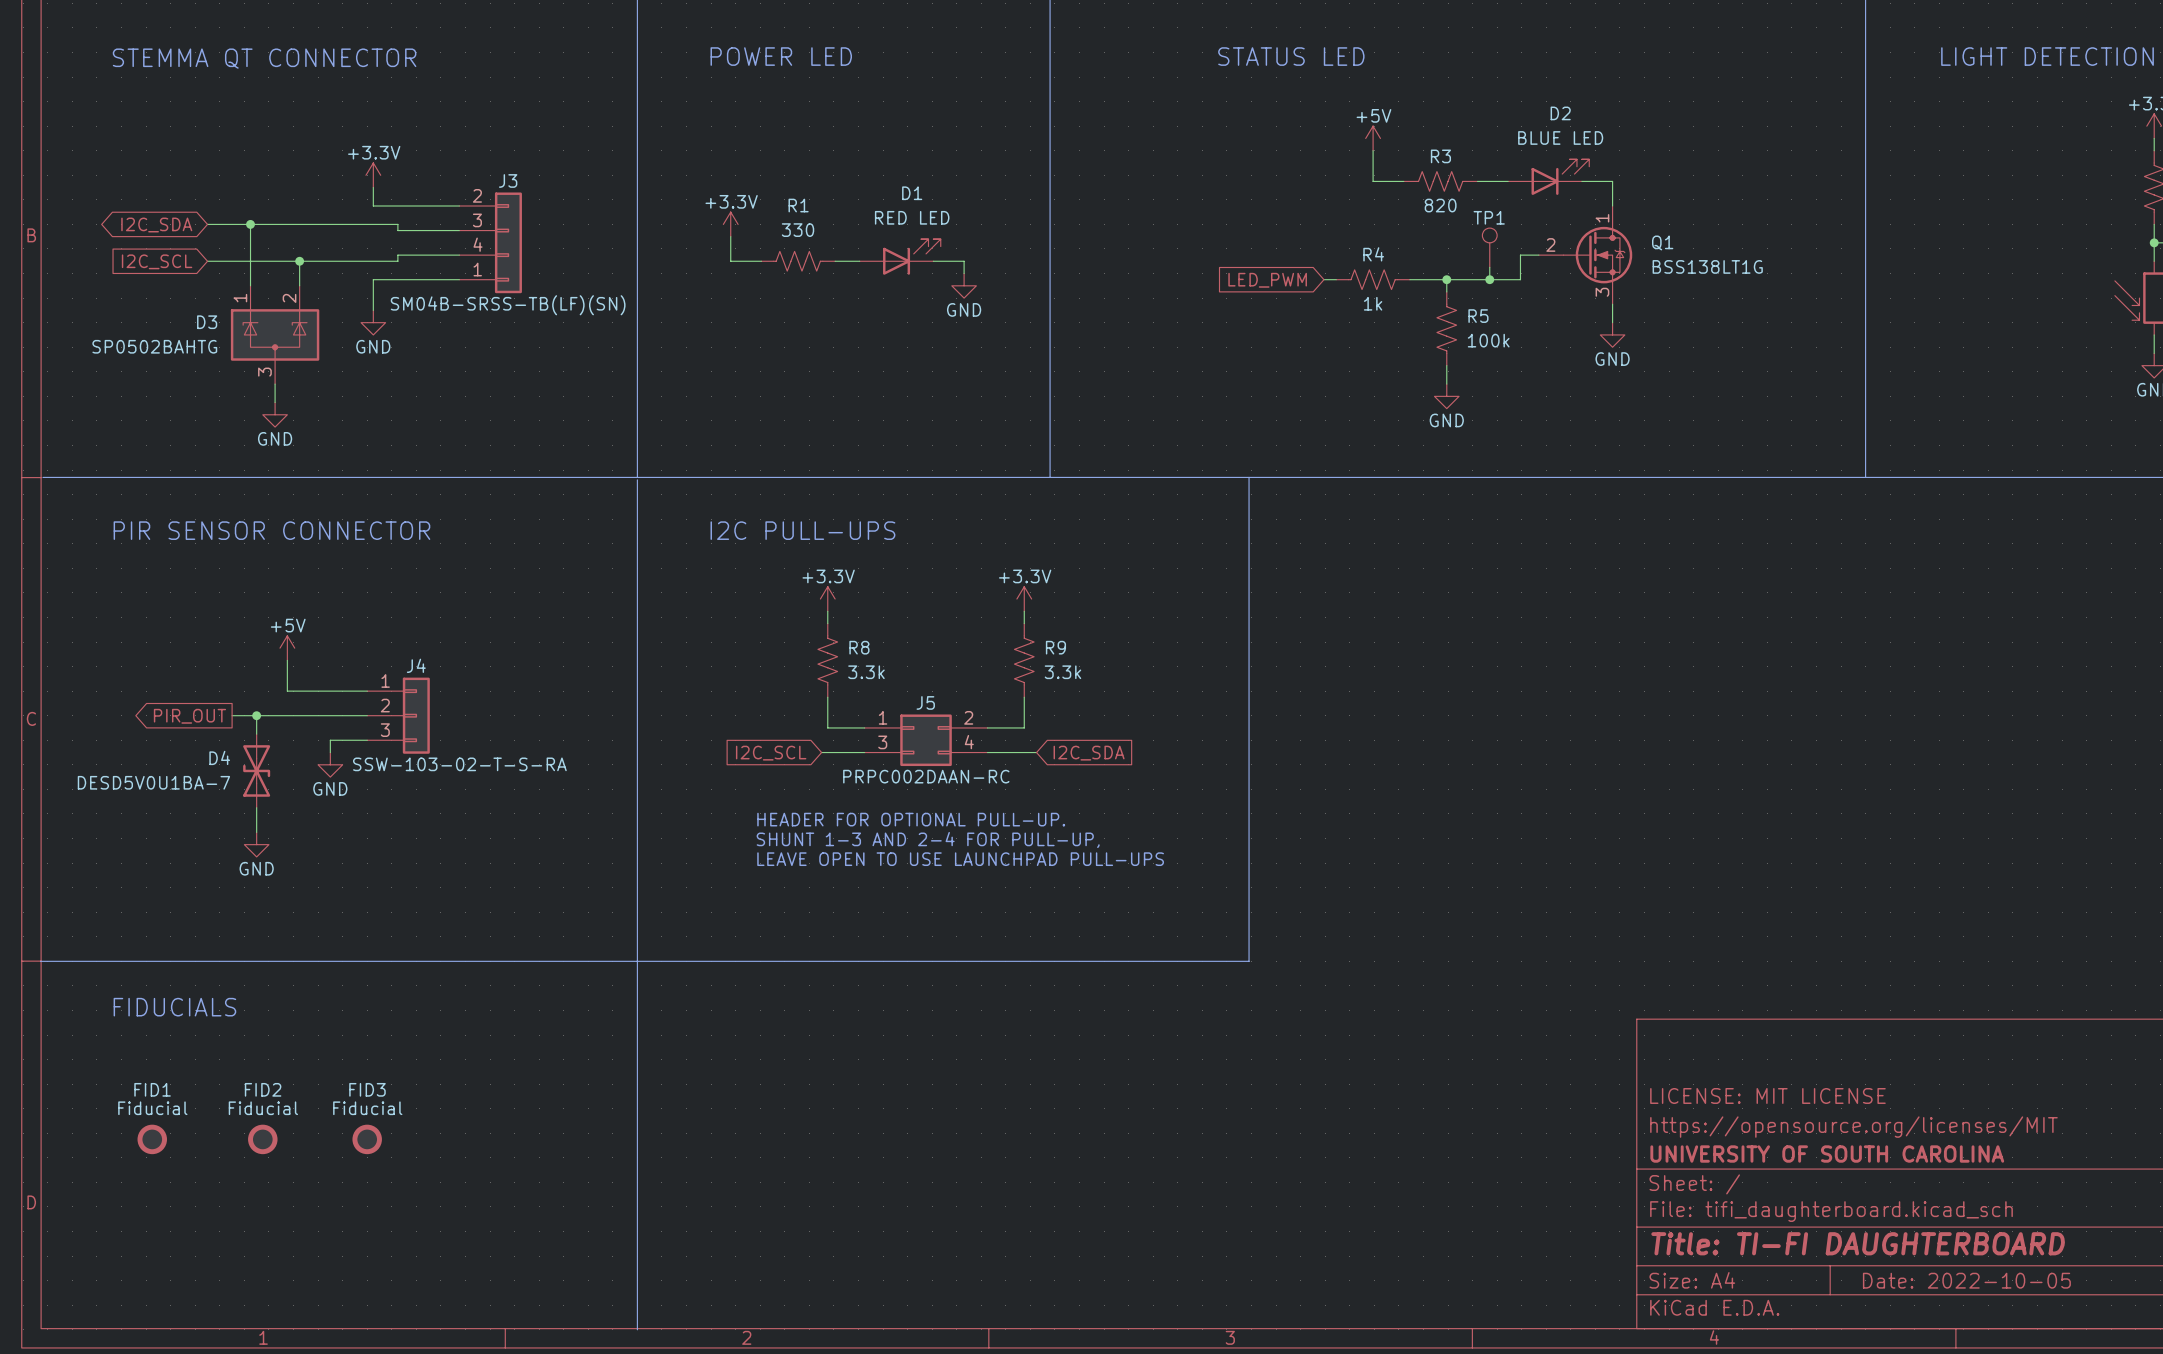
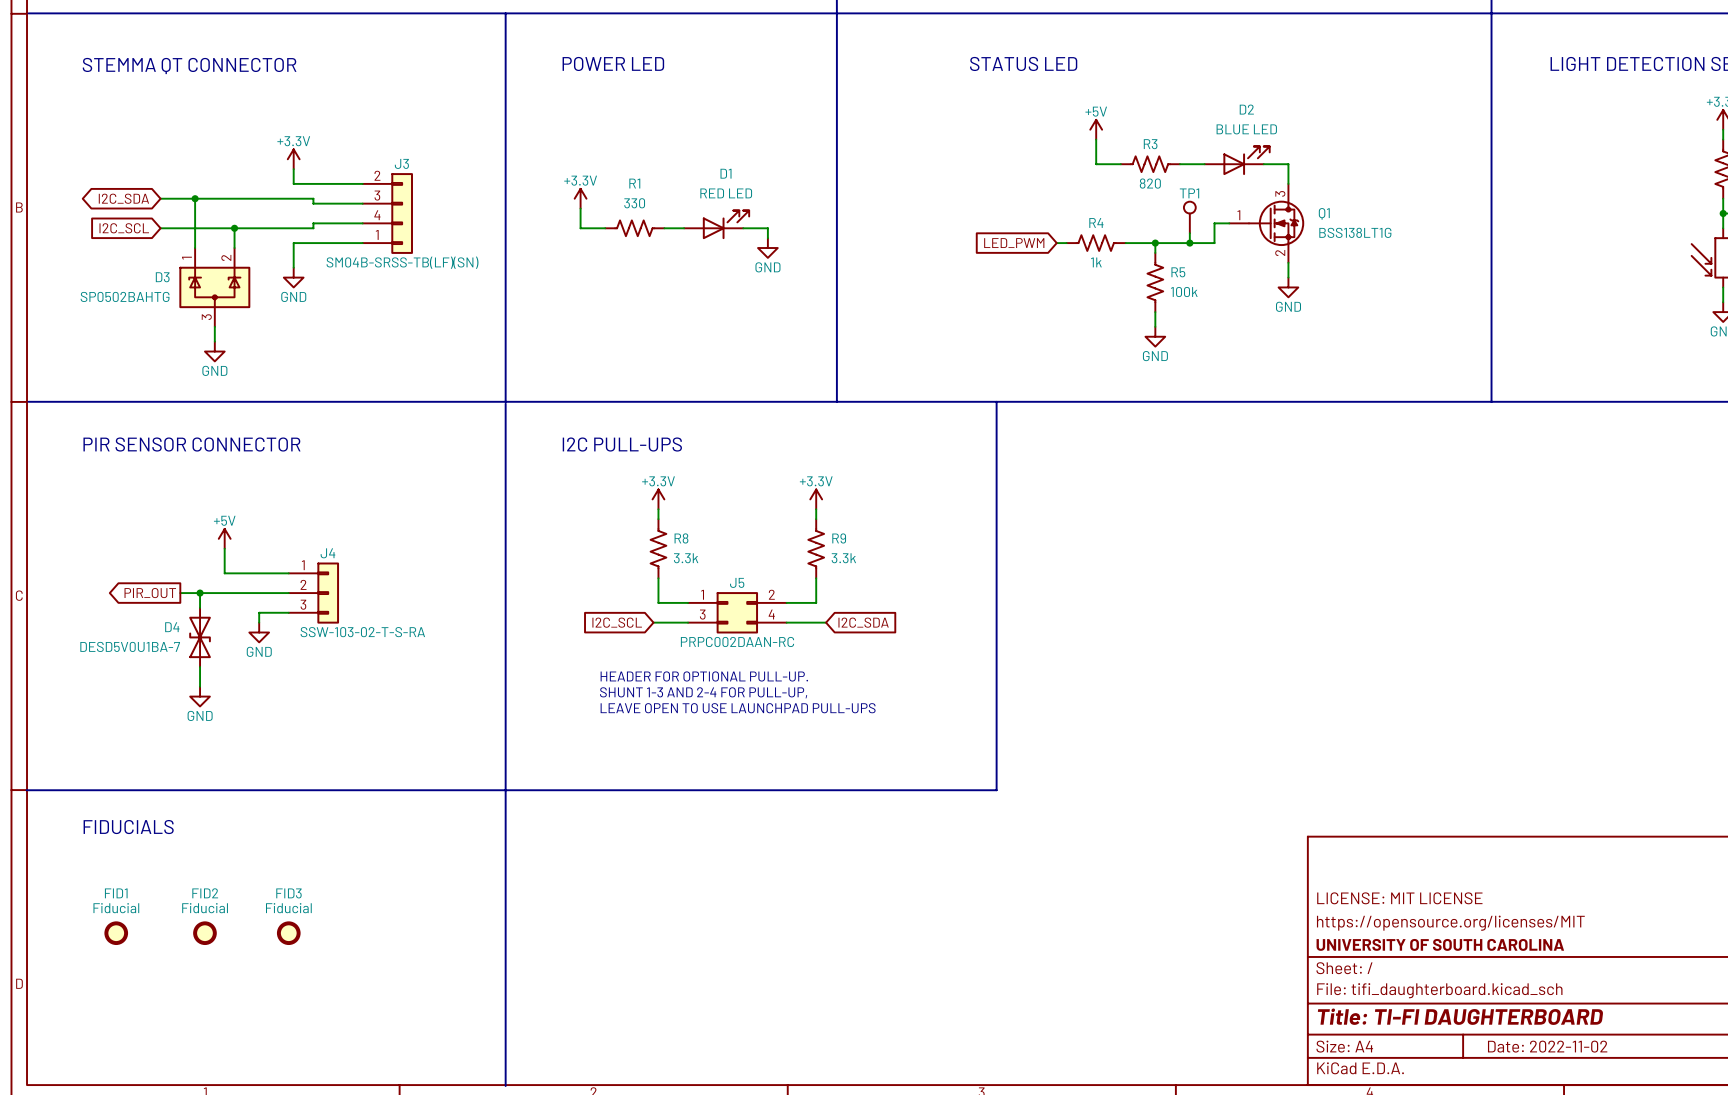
Q1 pin number: 1 (1602, 218) -> 3 (1280, 193)
Q1 pin number: 2 (1550, 244) -> 1 (1238, 215)
Q1 pin number: 3 (1602, 292) -> 2 (1280, 252)
title block: Date: 2022-10-05 (1966, 1280) -> Date: 2022-11-02 (1547, 1046)

